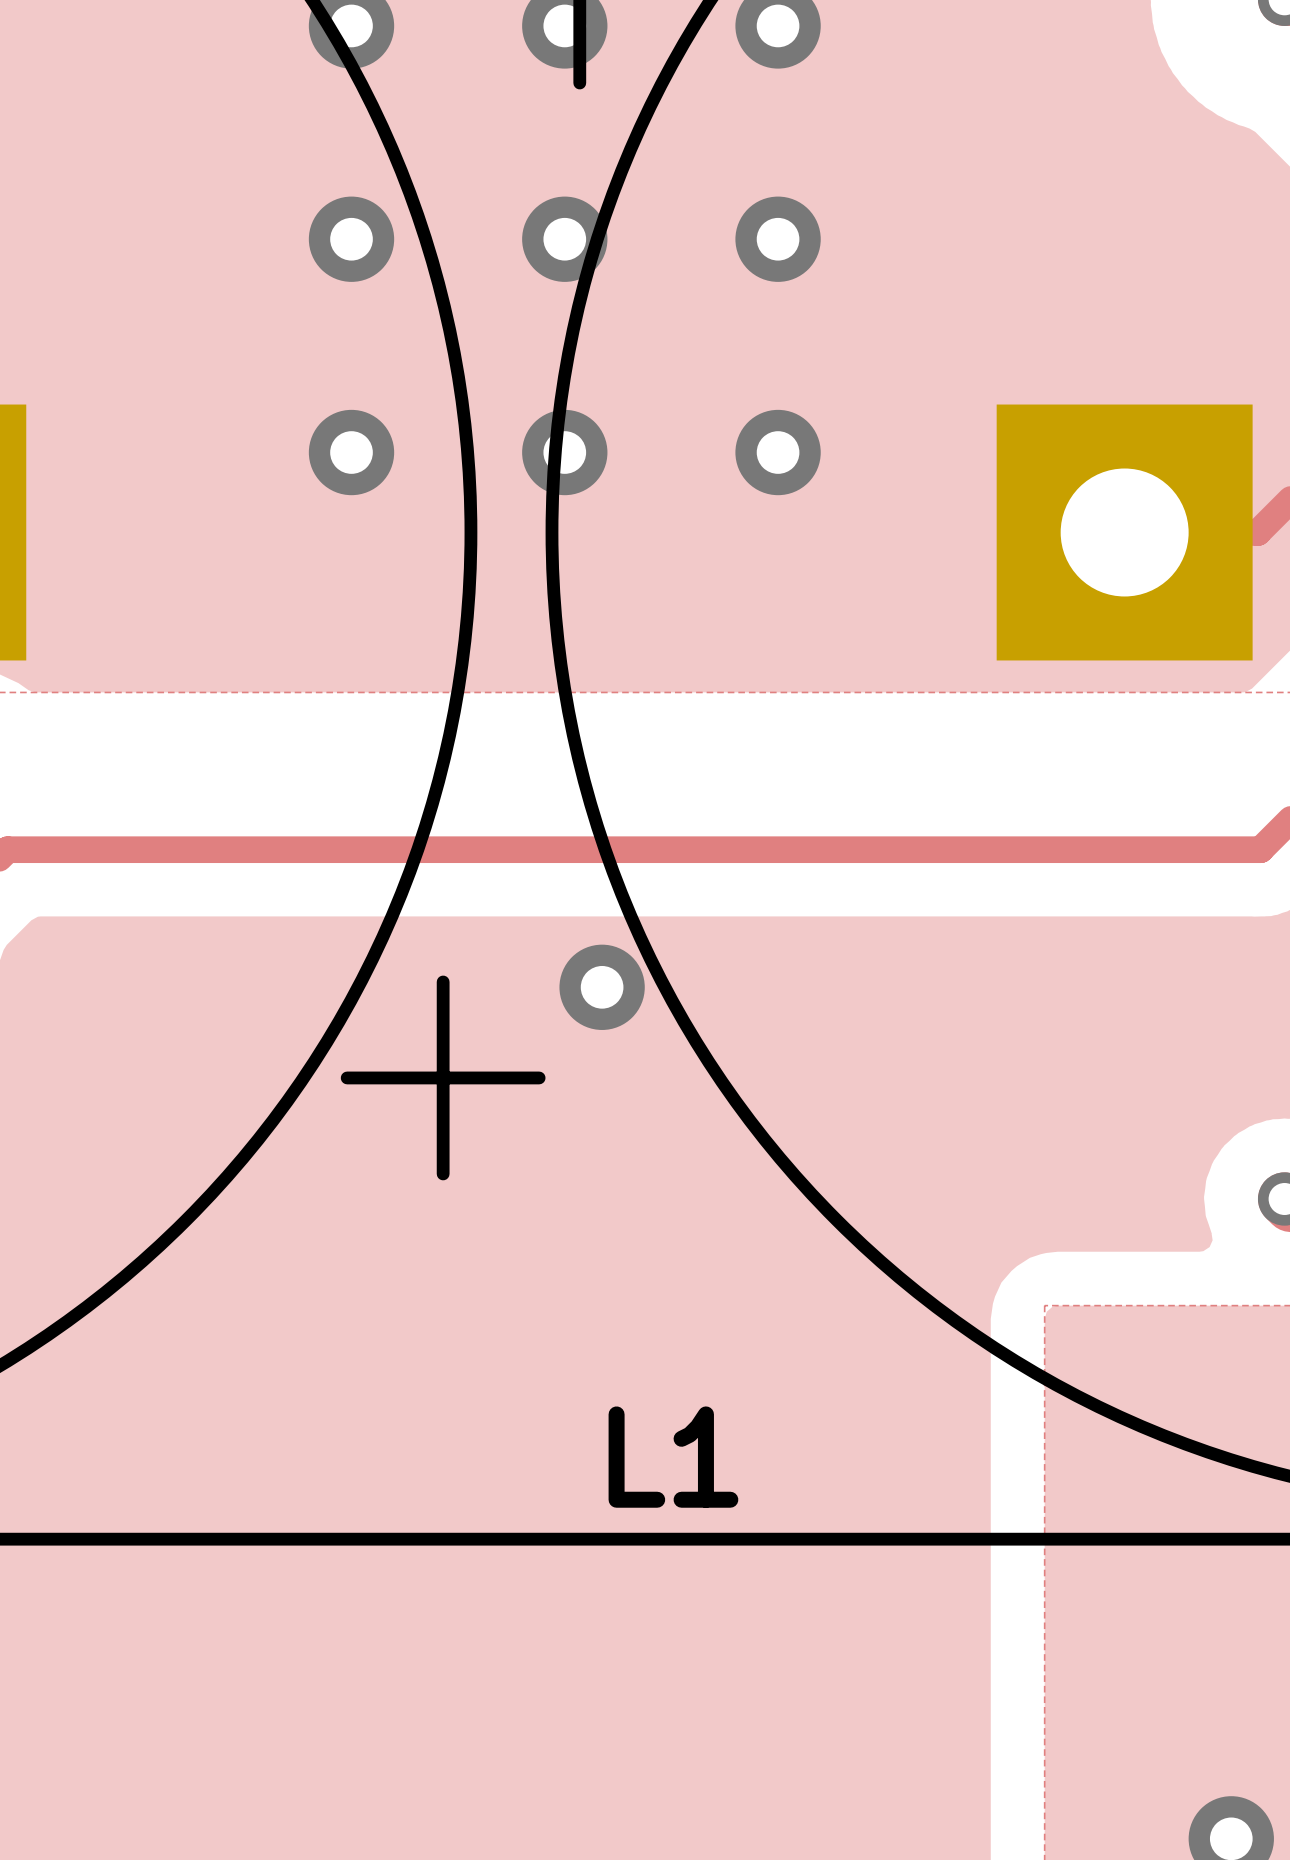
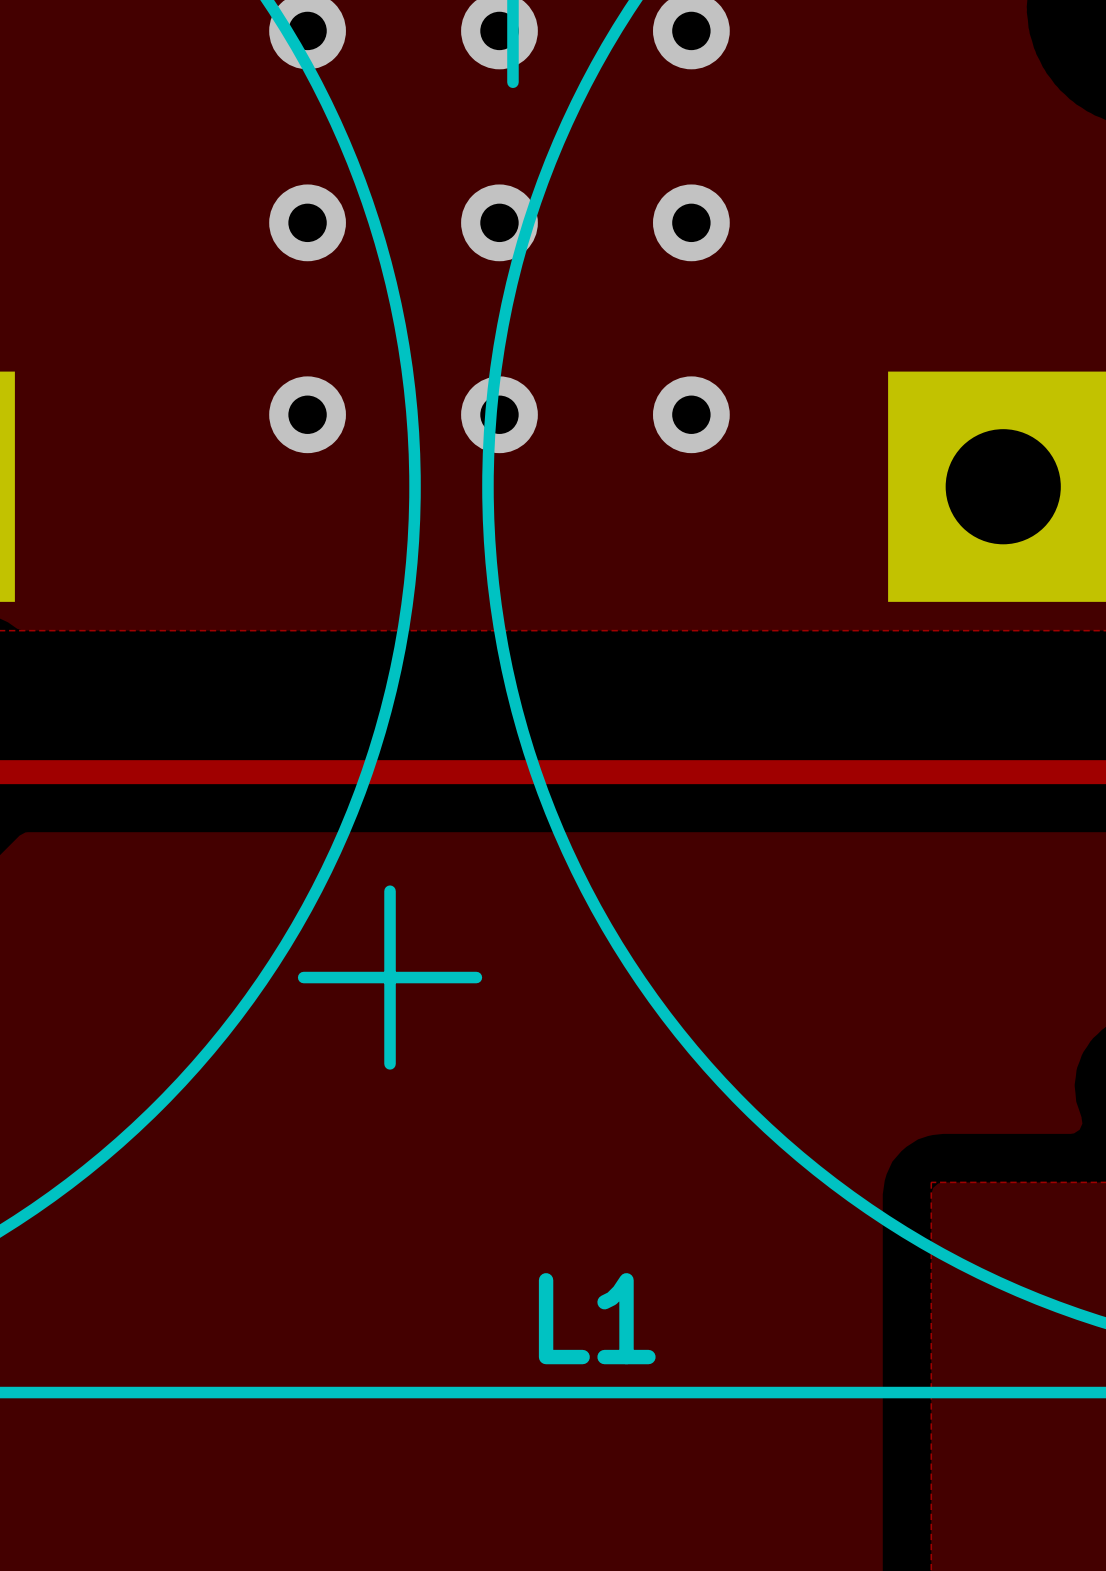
via: (602, 987) -> none

